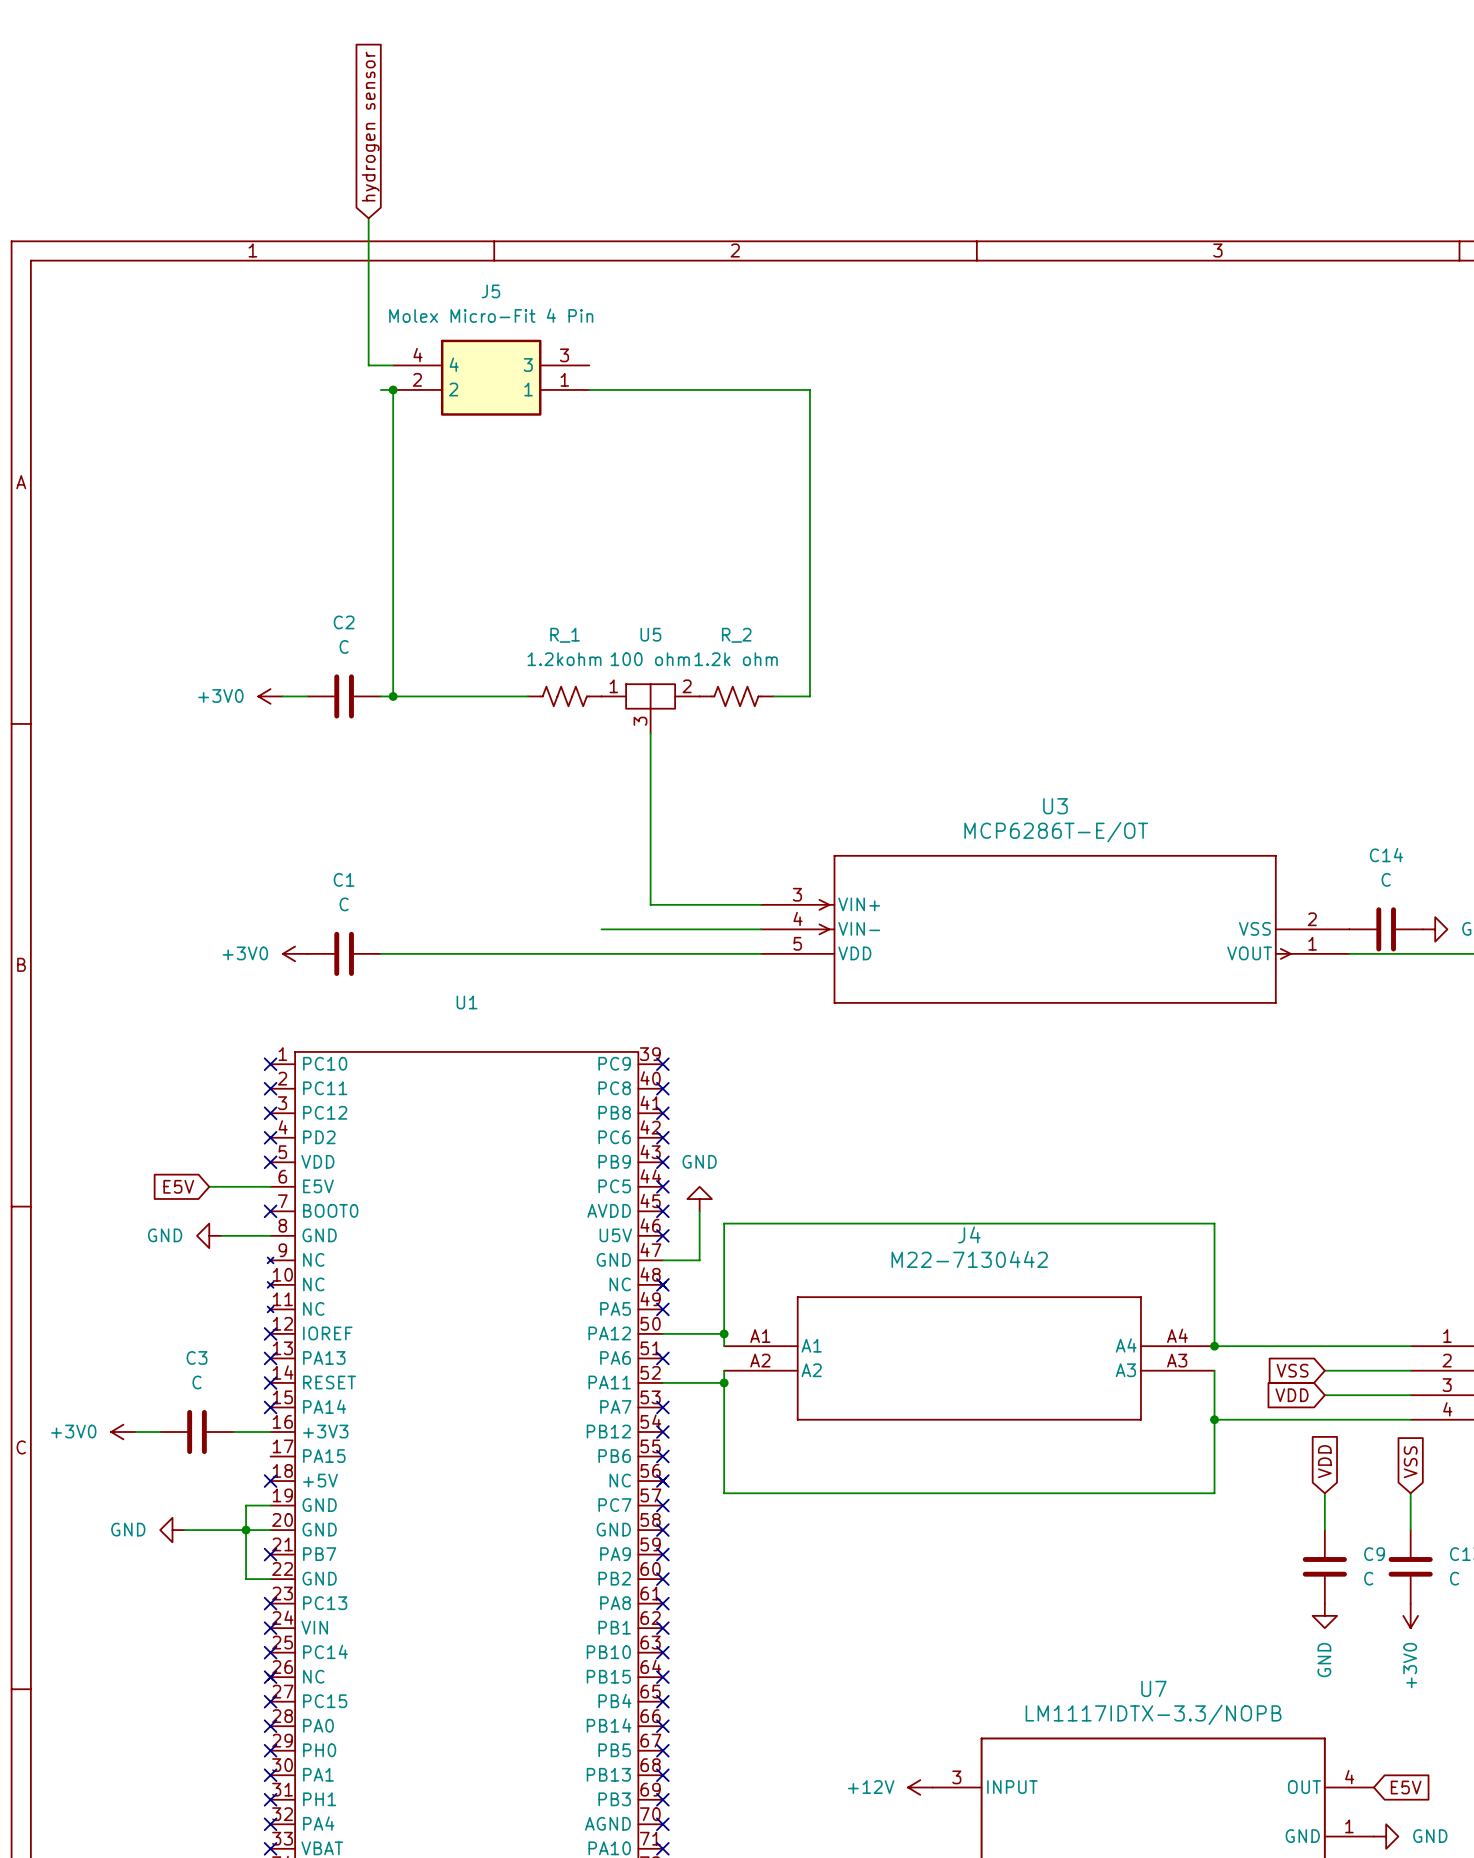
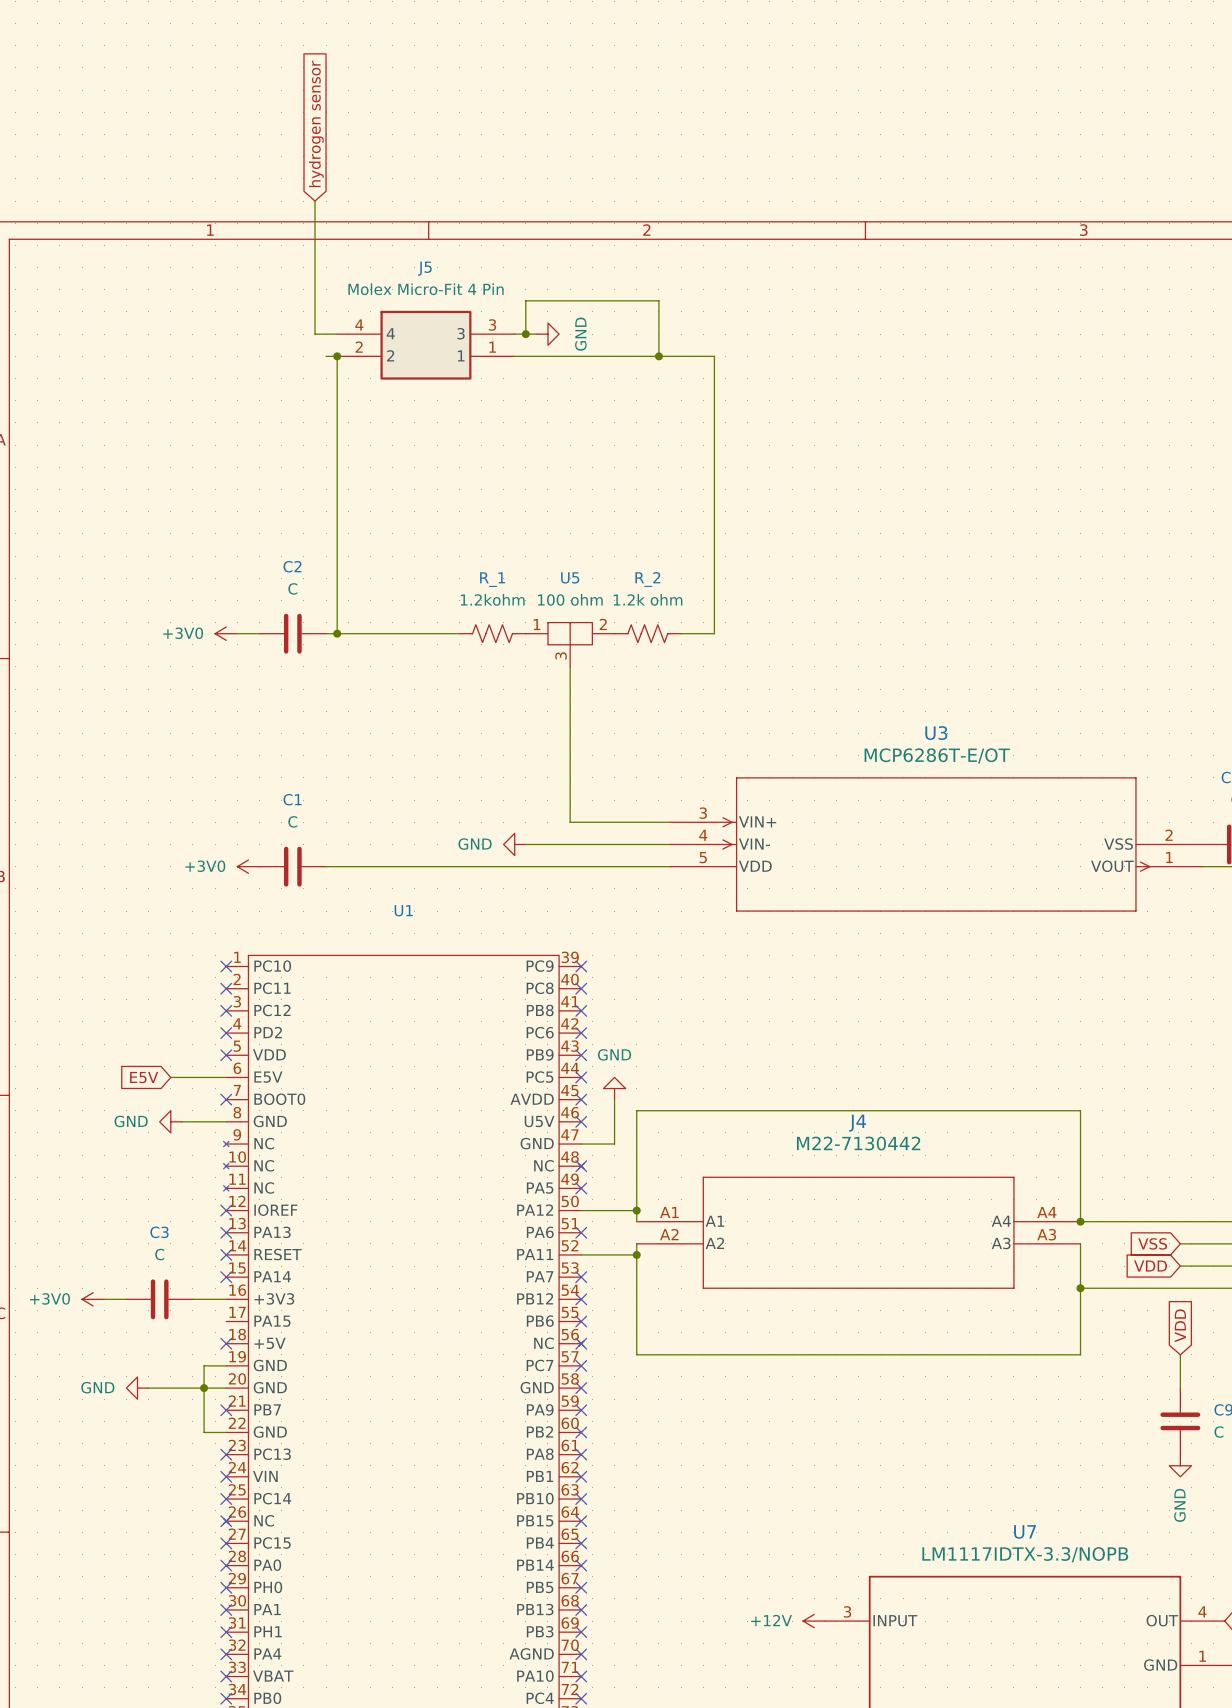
wire: none -> (514, 334) (536, 334)
wire: none -> (525, 334) (525, 300) (658, 300) (658, 356)
junction: none -> (525, 334)
power symbol: none -> GND (547, 334)
junction: none -> (658, 356)
power symbol: none -> GND (514, 844)

